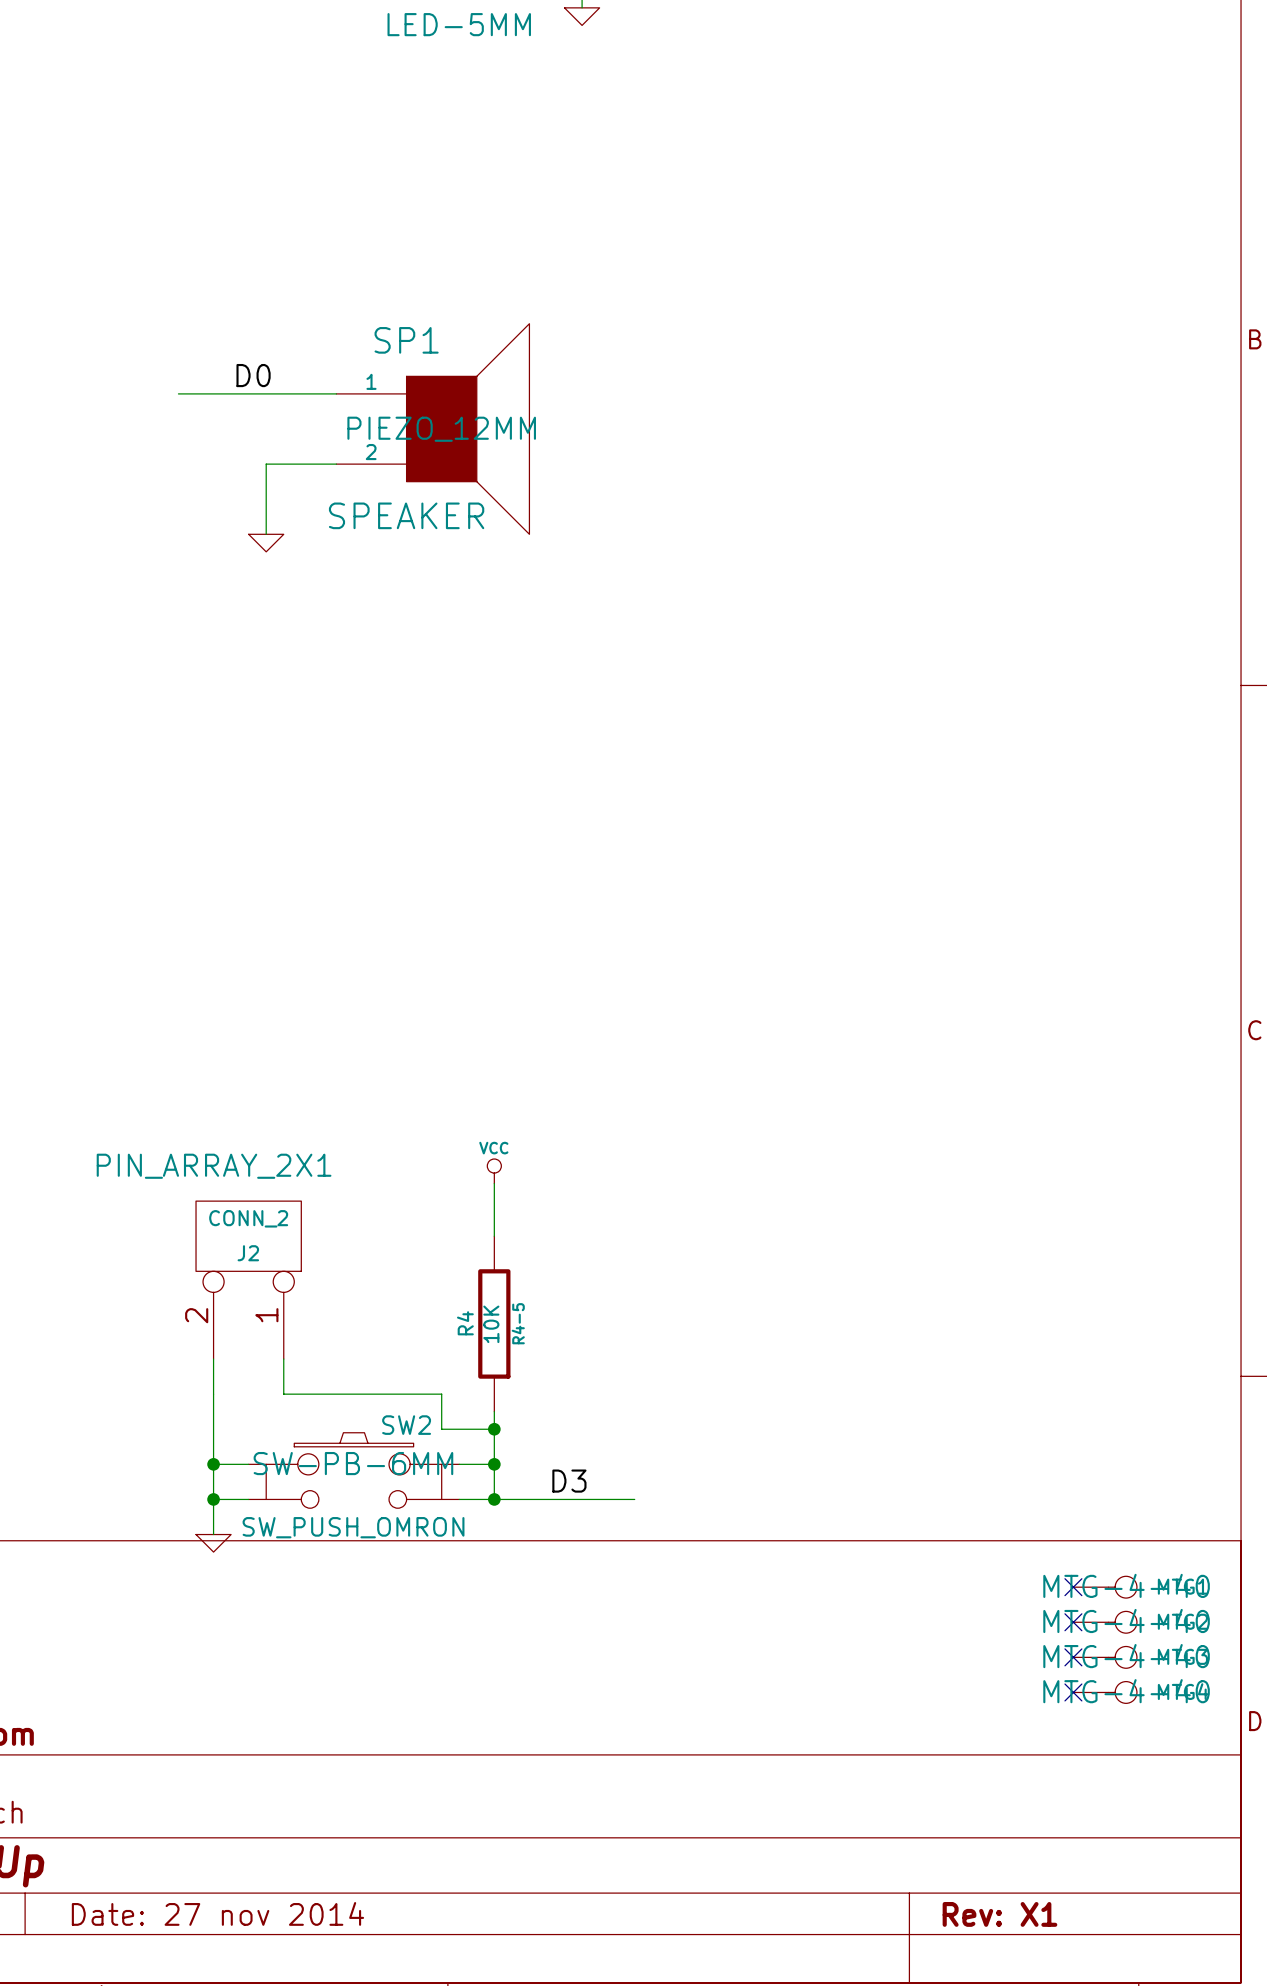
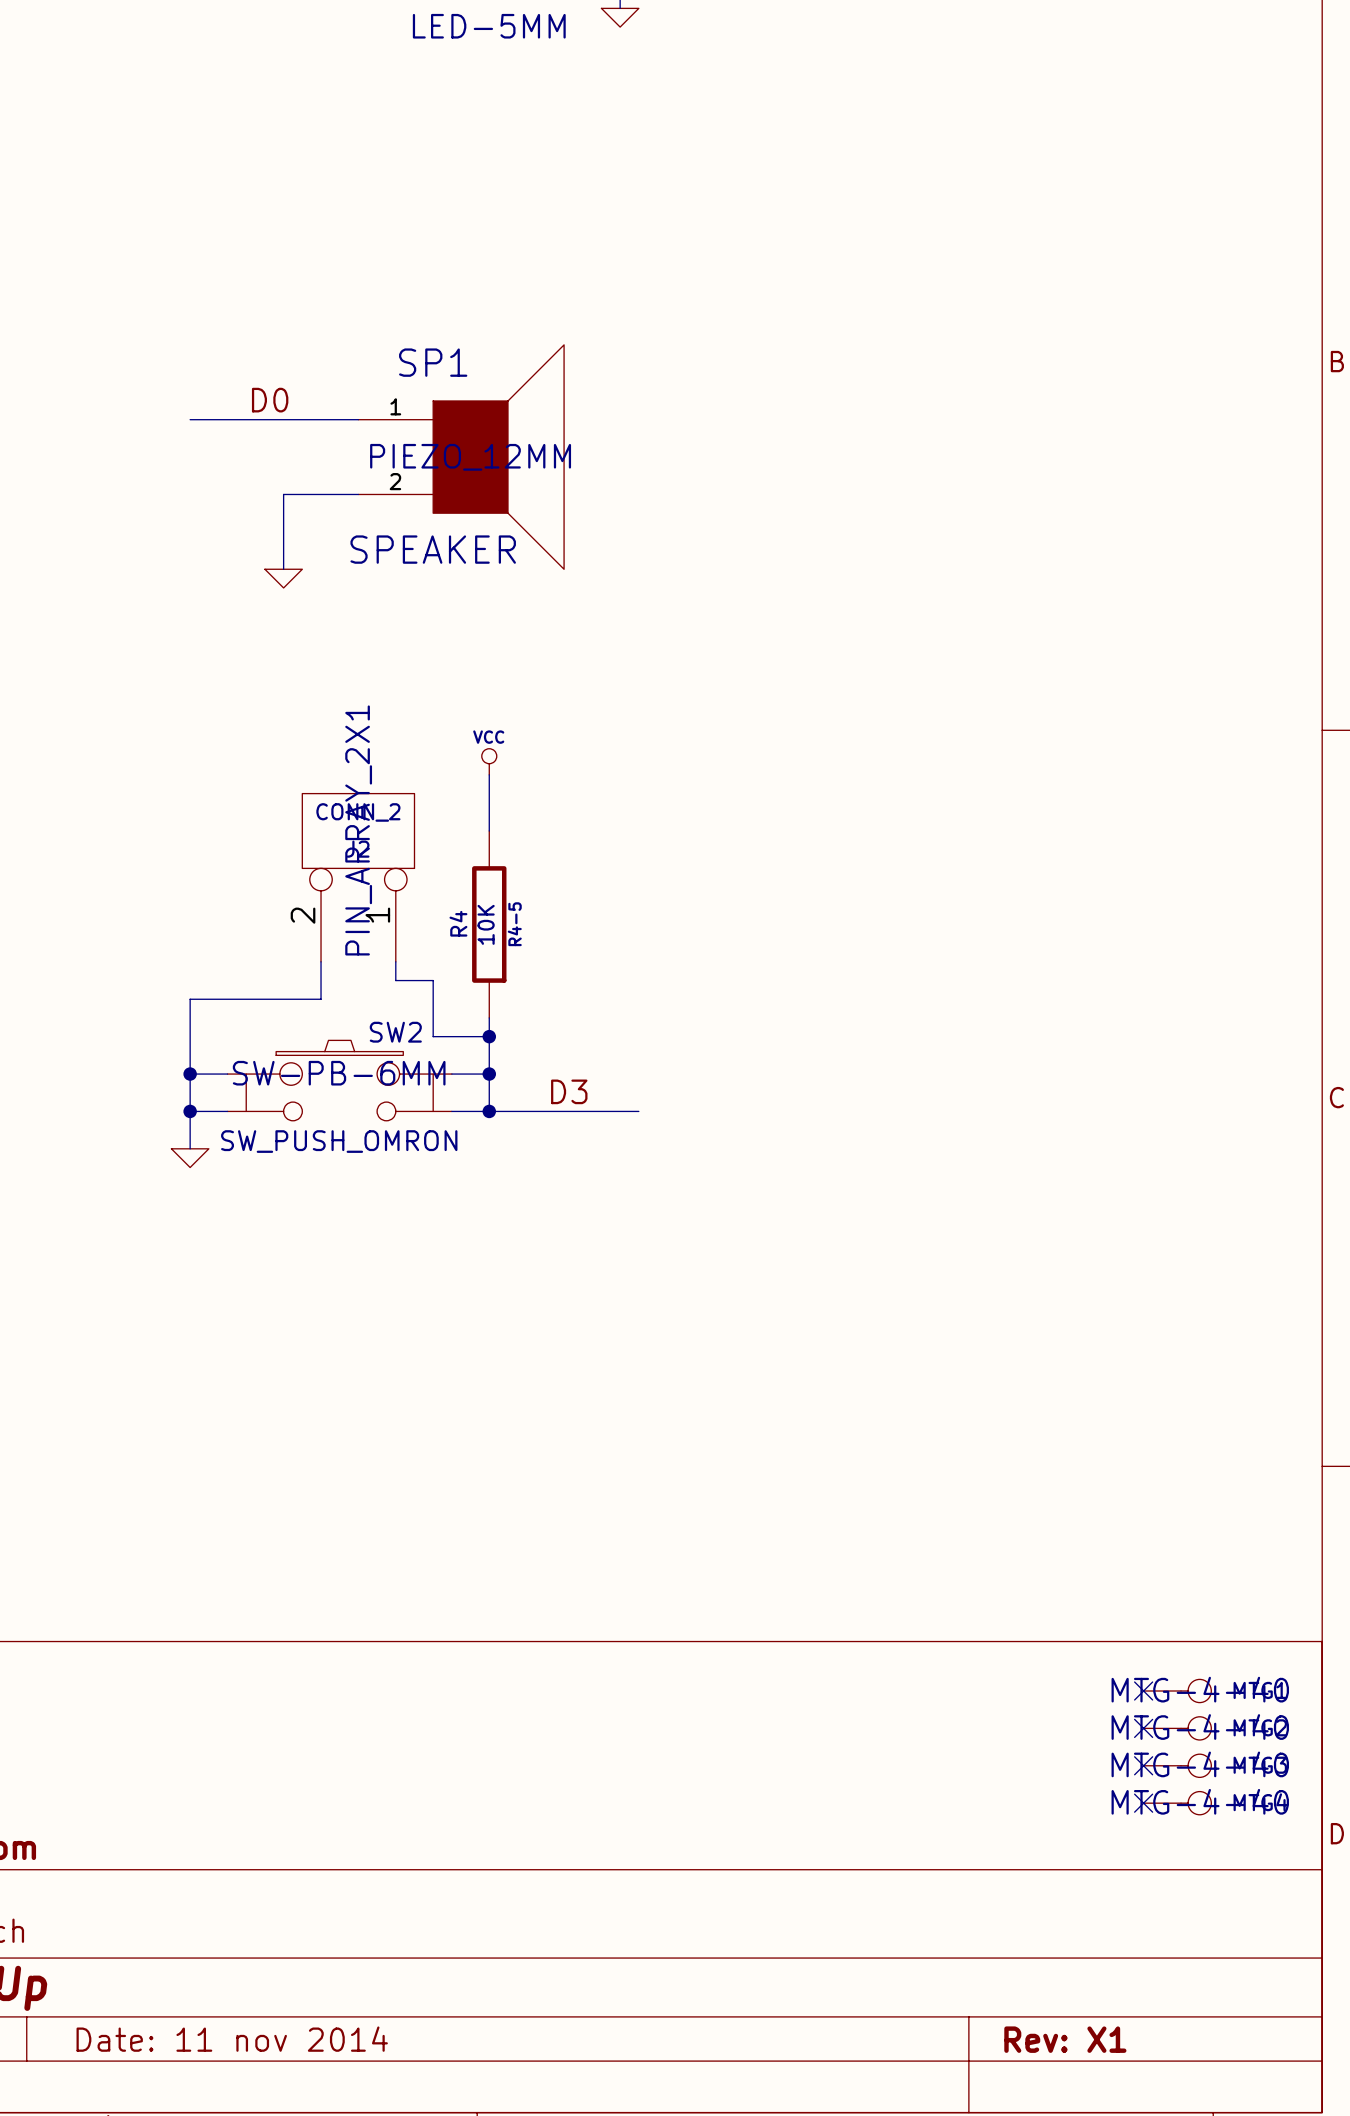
power symbol: none -> VCC (489, 761)
wire: none -> (489, 774) (489, 830)
wire: none -> (321, 961) (321, 999) (190, 999) (190, 1148)
wire: none -> (395, 961) (395, 980) (433, 980) (433, 1036) (489, 1036)
wire: none -> (489, 1017) (489, 1111)
junction: none -> (489, 1036)
wire: none -> (190, 1074) (227, 1074)
junction: none -> (190, 1074)
wire: none -> (451, 1074) (489, 1074)
junction: none -> (489, 1074)
label: none -> D3 (569, 1091)
wire: none -> (190, 1111) (227, 1111)
junction: none -> (190, 1111)
wire: none -> (451, 1111) (638, 1111)
junction: none -> (489, 1111)
power symbol: none -> (190, 1158)
J2 text rotation: 0° (214, 1166) -> 90° counterclockwise (358, 830)
power symbol: VCC (494, 1171) -> none
wire: (494, 1183) (494, 1236) -> none
J2 position: (248, 1280) -> (358, 877)
R4 position: (494, 1323) -> (489, 924)
wire: (213, 1359) (213, 1534) -> none
wire: (283, 1359) (283, 1394) (441, 1394) (441, 1429) (494, 1429) -> none
wire: (494, 1411) (494, 1499) -> none
junction: (494, 1429) -> none
wire: (213, 1464) (248, 1464) -> none
junction: (213, 1464) -> none
wire: (459, 1464) (494, 1464) -> none
junction: (494, 1464) -> none
SW2 position: (353, 1470) -> (339, 1080)
label: D3 (569, 1481) -> none
wire: (213, 1499) (248, 1499) -> none
junction: (213, 1499) -> none
wire: (459, 1499) (634, 1499) -> none
junction: (494, 1499) -> none
power symbol: (213, 1543) -> none
title block: Date: 27 nov 2014 (217, 1913) -> Date: 11 nov 2014 (232, 2039)

